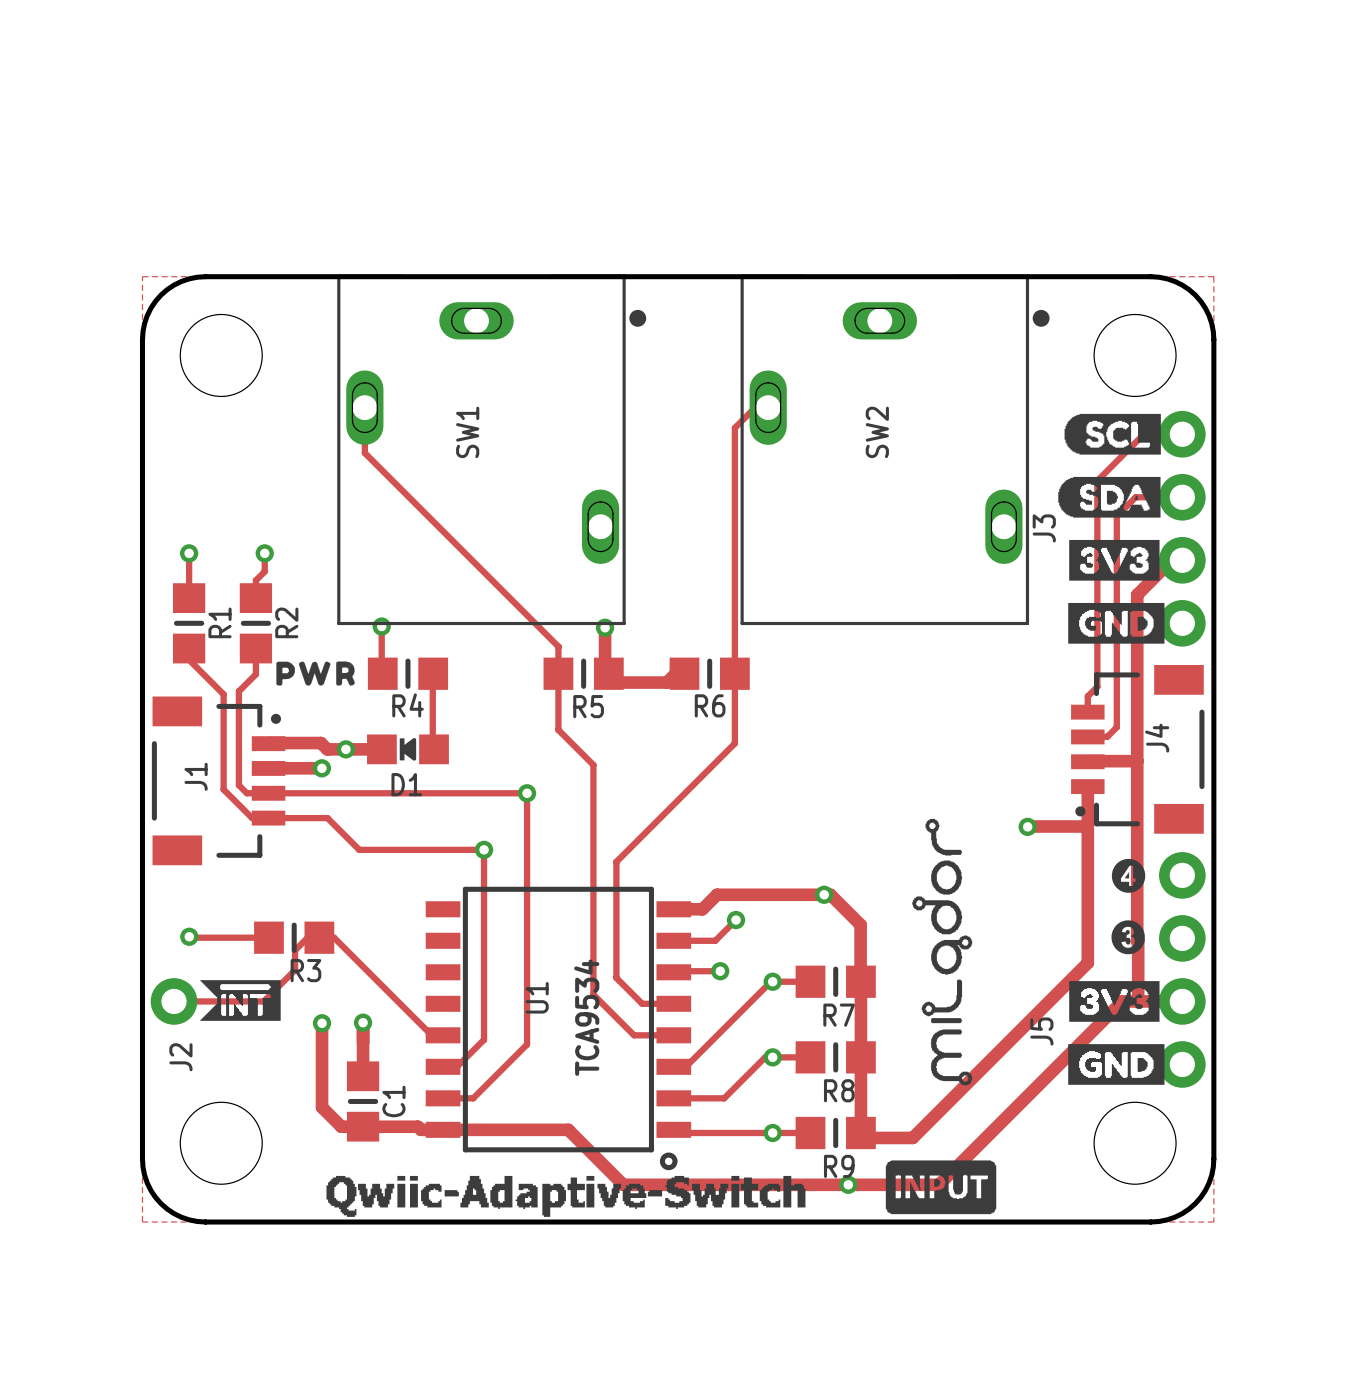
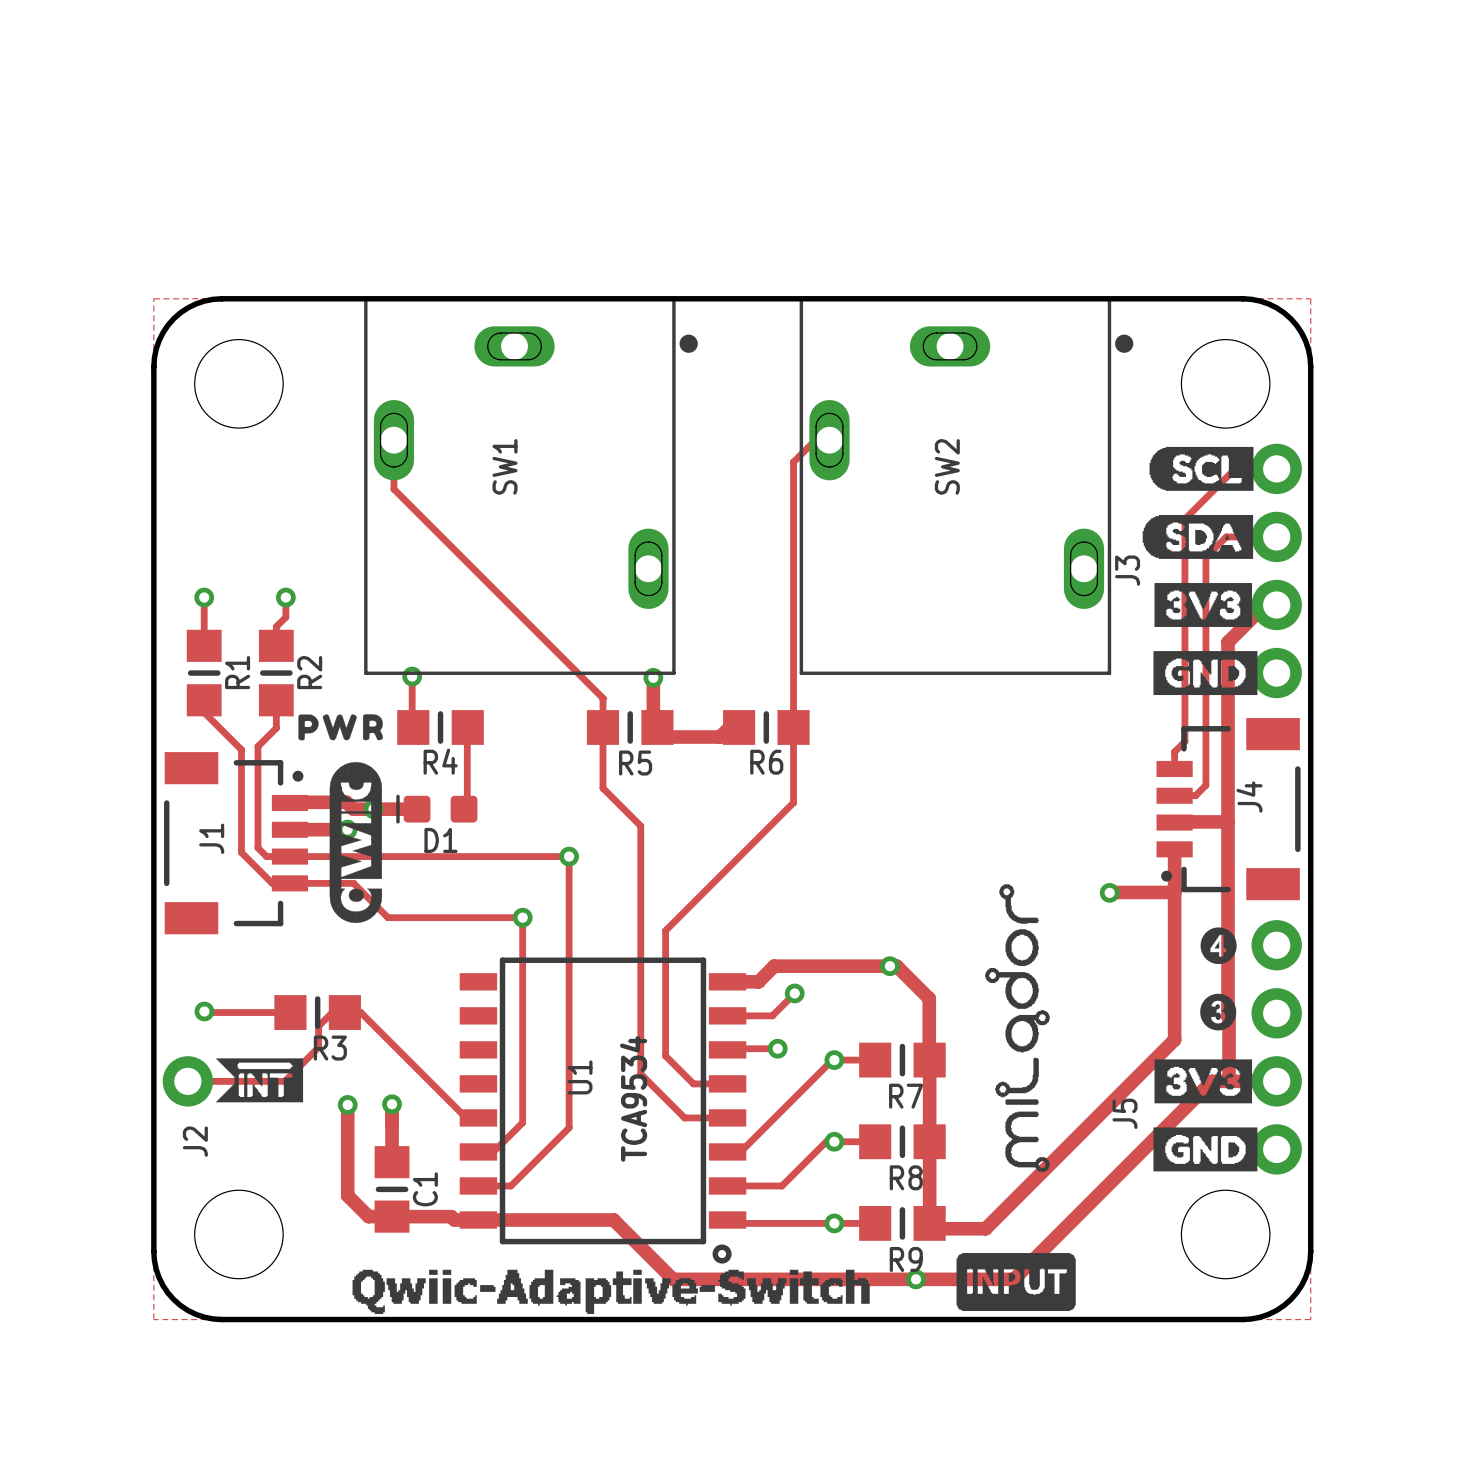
drawing: none -> [329, 762, 383, 923]
D1 footprint: [367, 734, 449, 765] -> [396, 794, 478, 824]

